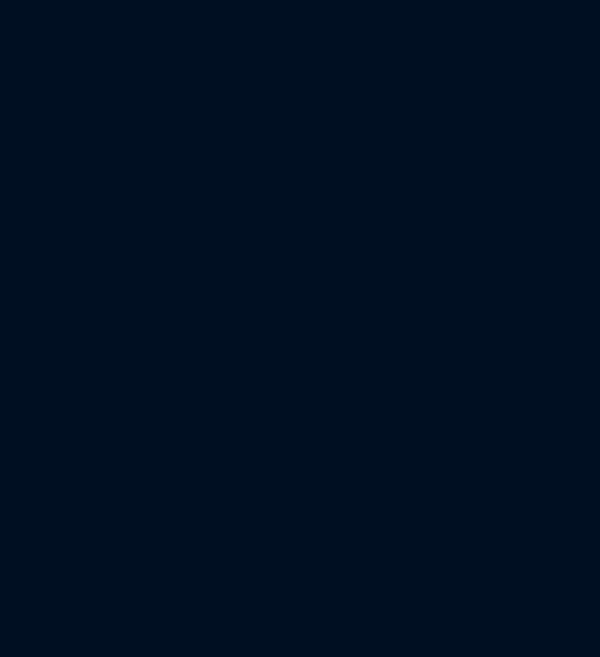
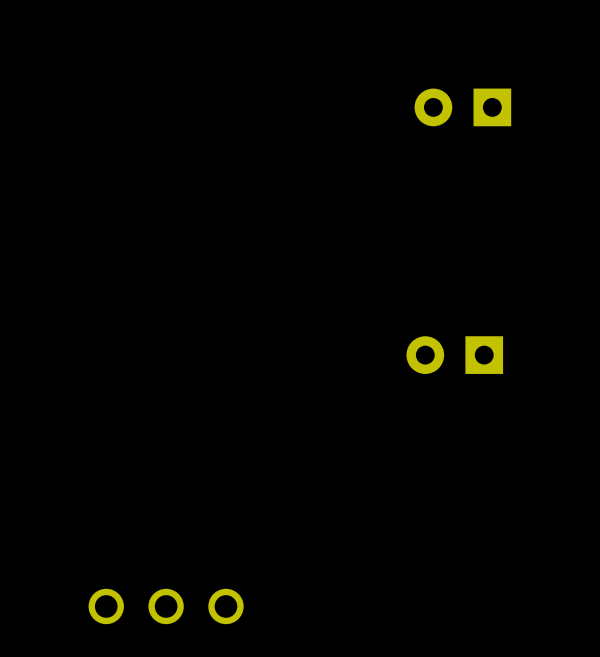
part: none -> (462, 107)
part: none -> (454, 355)
part: none -> (166, 606)

